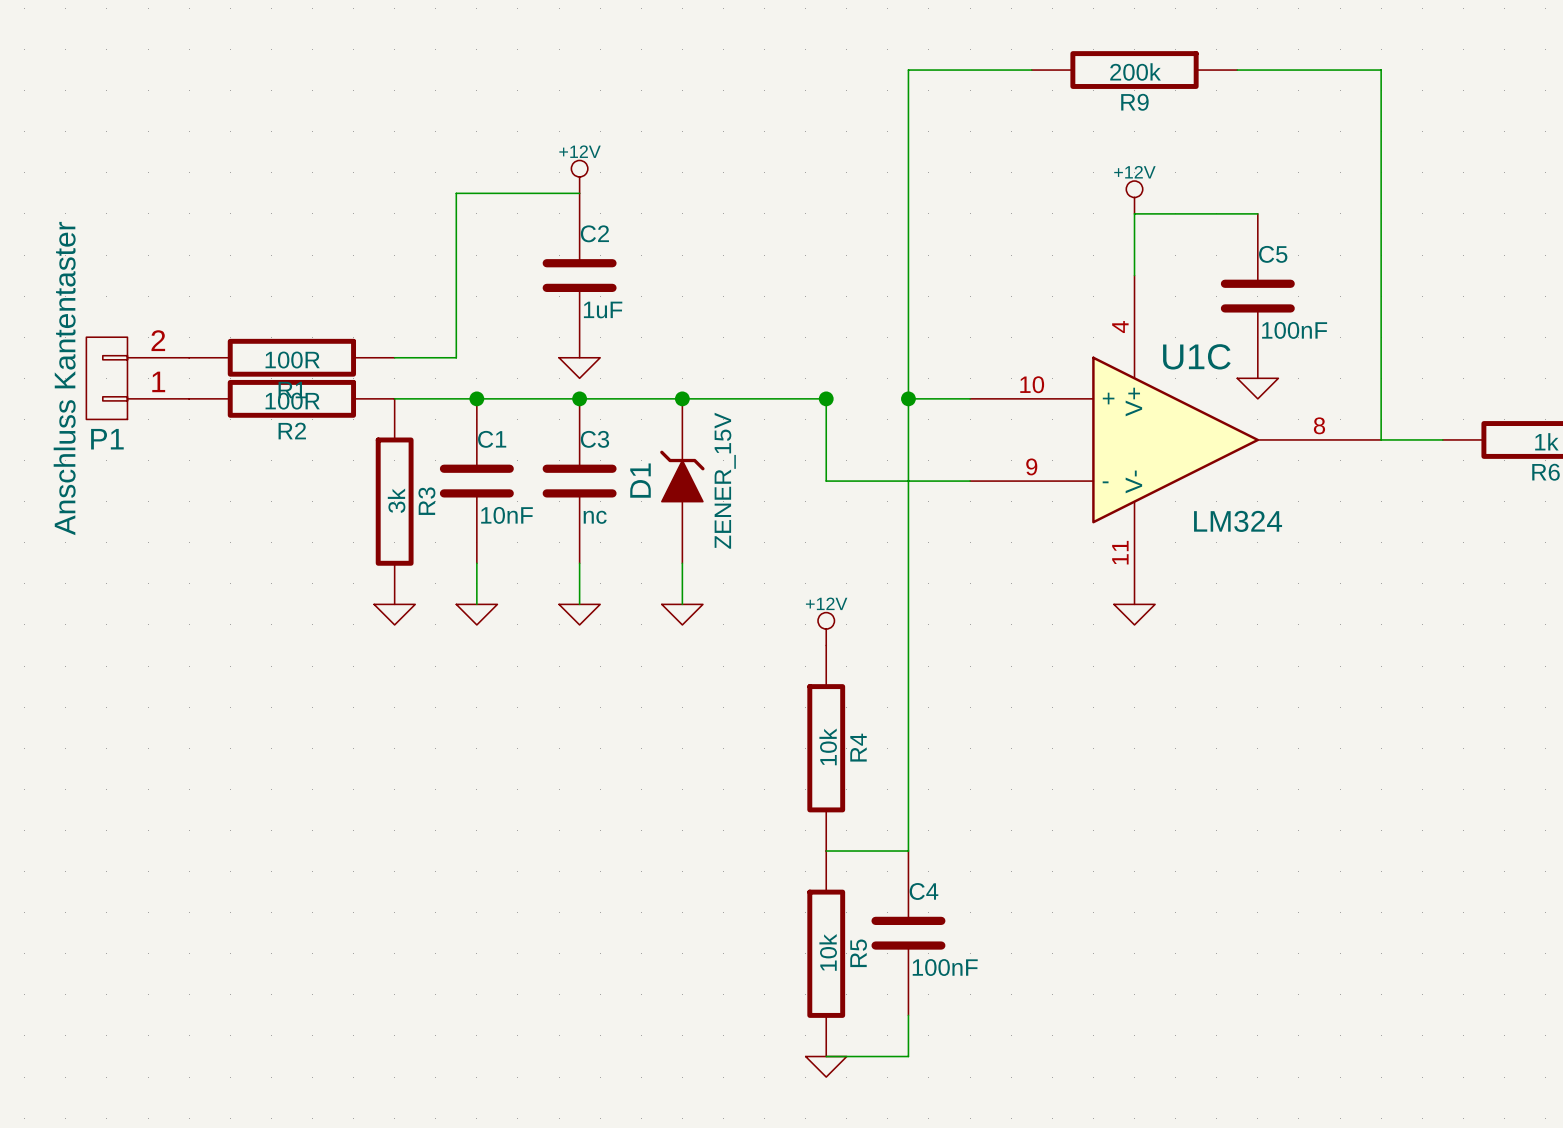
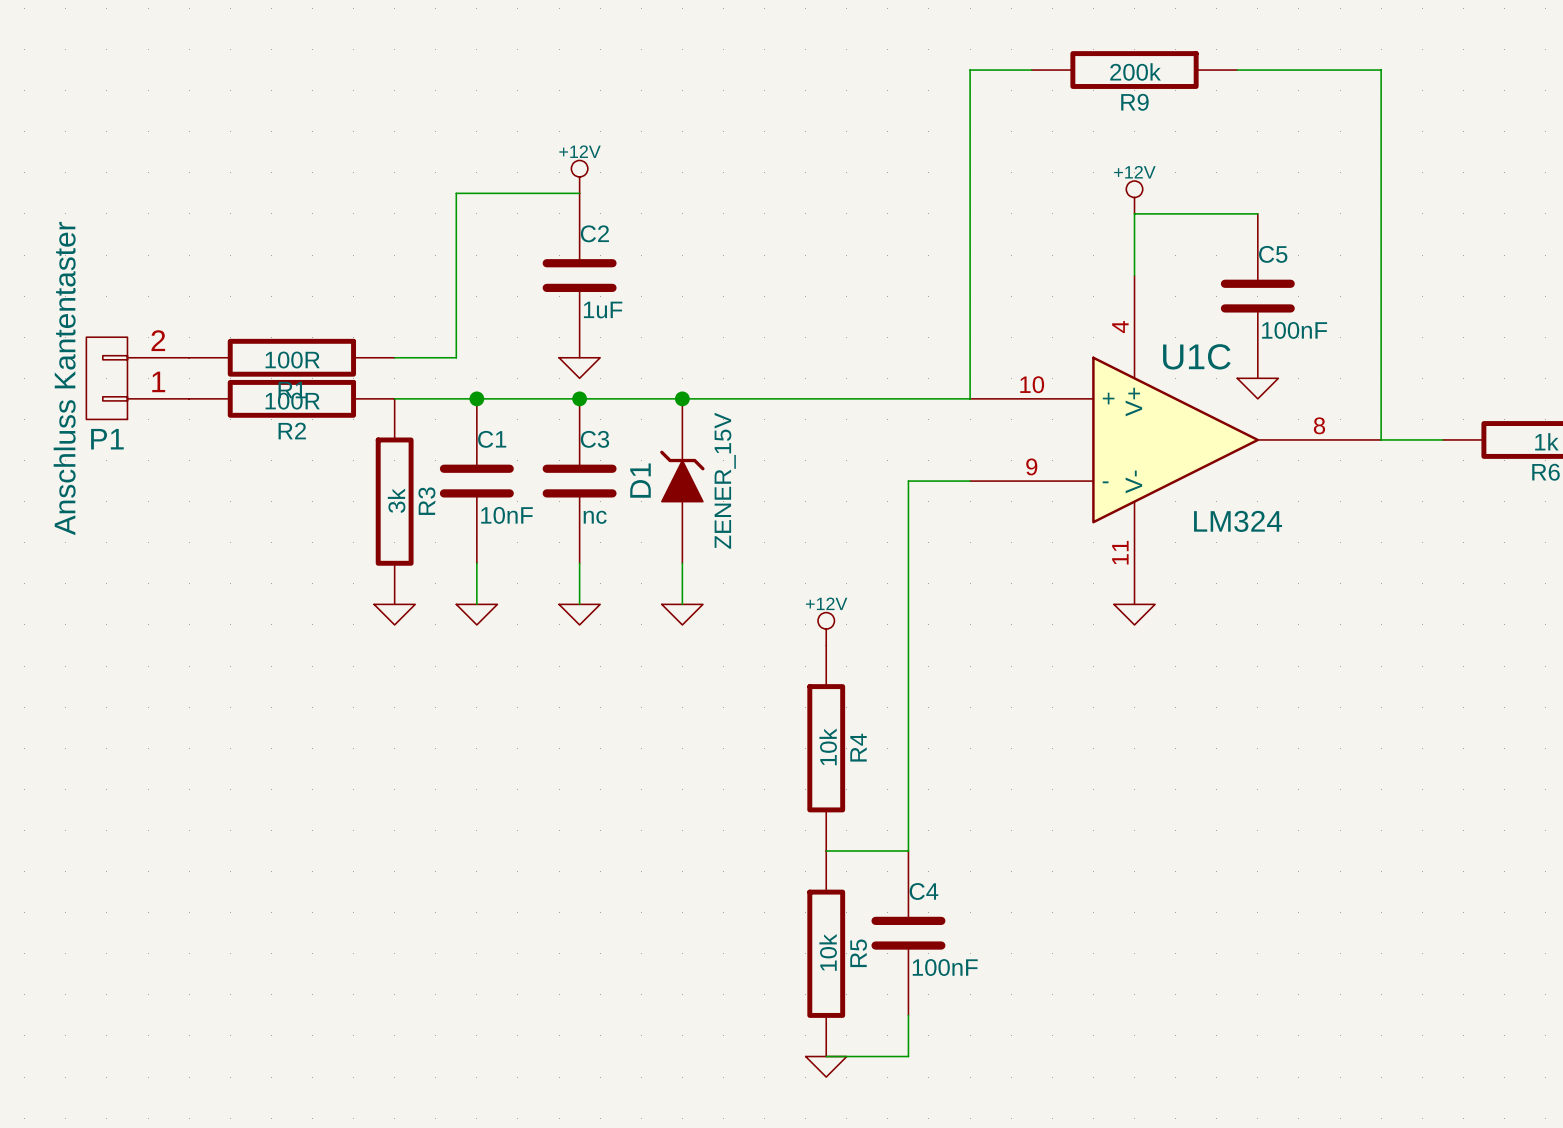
wire: (970, 70) (908, 70) (908, 481) (826, 481) (826, 398) -> (970, 70) (970, 398)
wire: none -> (826, 398) (908, 398)
junction: (826, 398) -> none
junction: (908, 398) -> none

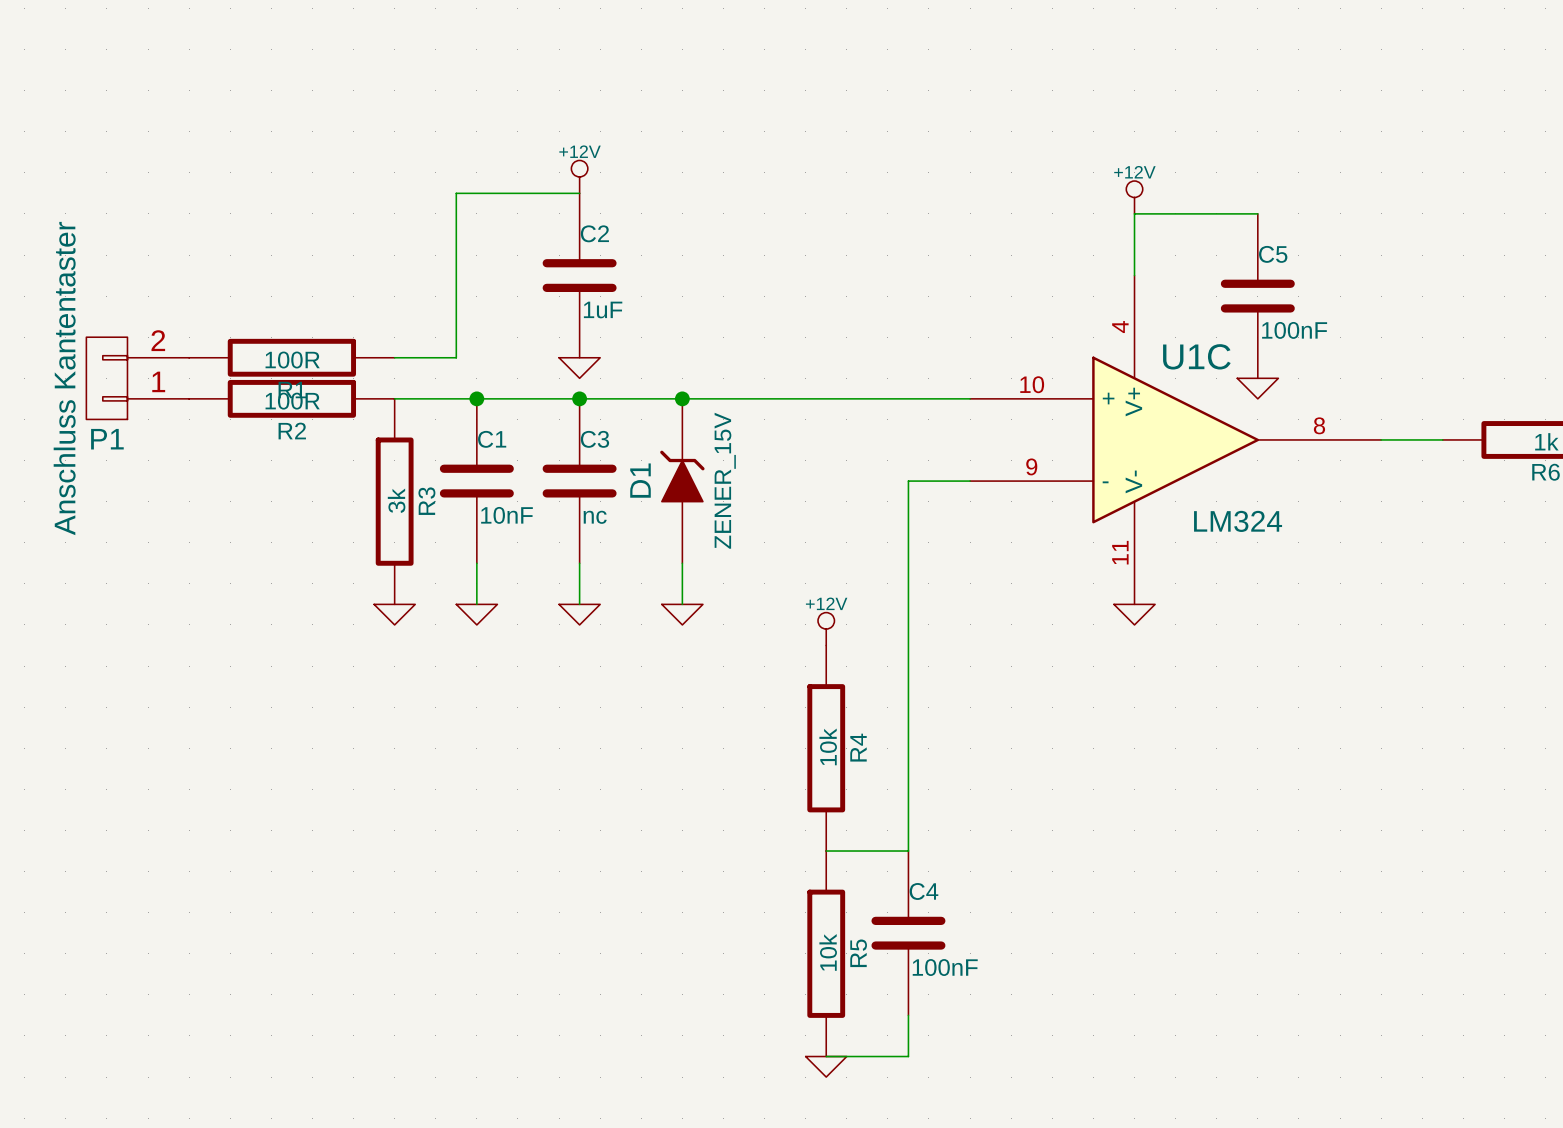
wire: (1031, 70) (970, 70) (970, 398) -> none
R9: 200k (1134, 70) -> none
wire: (1237, 70) (1381, 70) (1381, 439) -> none

